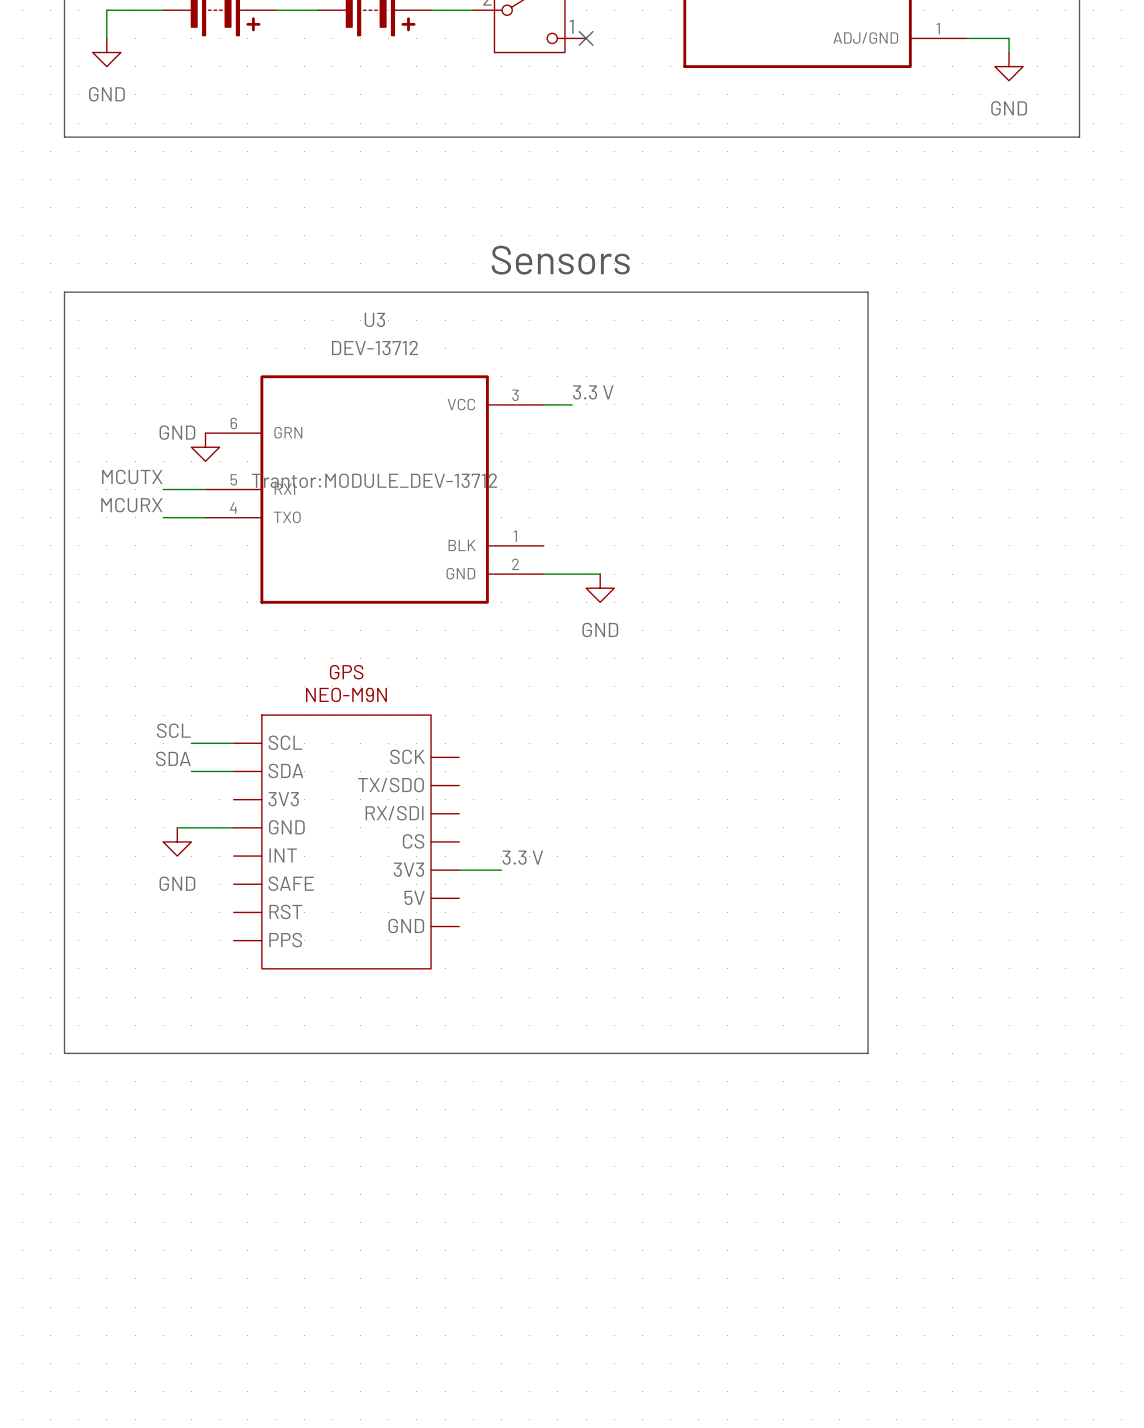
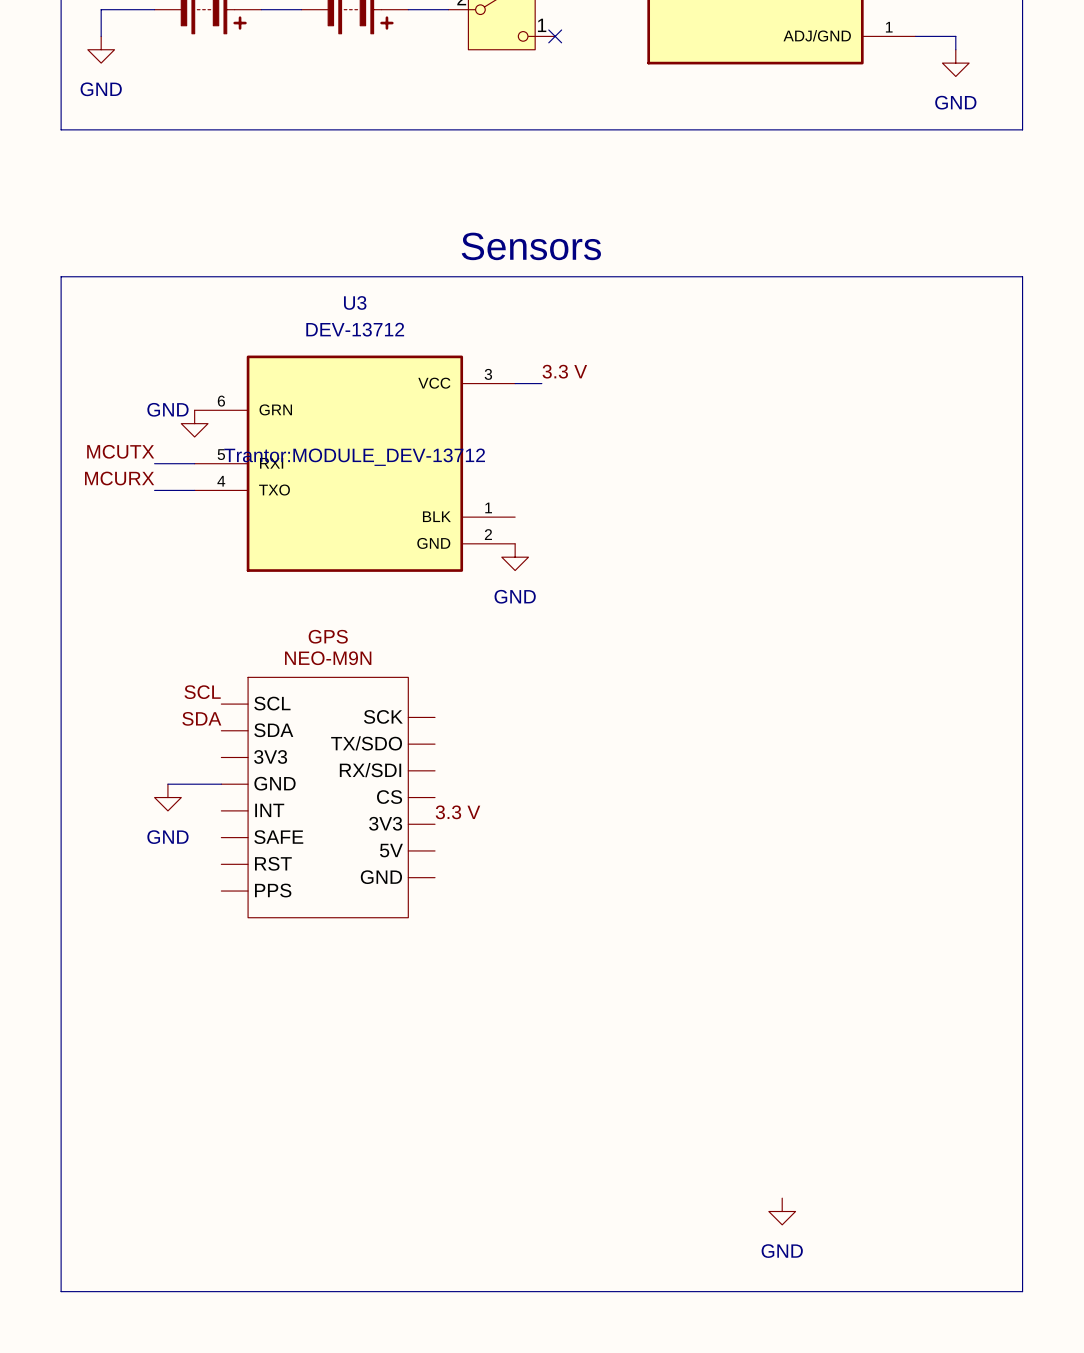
line: (868, 292) (868, 1053) (64, 1053) -> (822, 276) (1022, 276) (1022, 1291) (61, 1291) (61, 997)
wire: (543, 574) (600, 574) -> none
power symbol position: GND (600, 588) -> GND (515, 557)
label position: SCL (173, 730) -> SCL (202, 692)
wire: (191, 743) (233, 743) -> none
label position: SDA (173, 758) -> SDA (201, 718)
wire: (191, 771) (233, 771) -> none
label position: 3.3 V (522, 857) -> 3.3 V (458, 812)
wire: (459, 870) (501, 870) -> none
power symbol: none -> GND (782, 1211)

